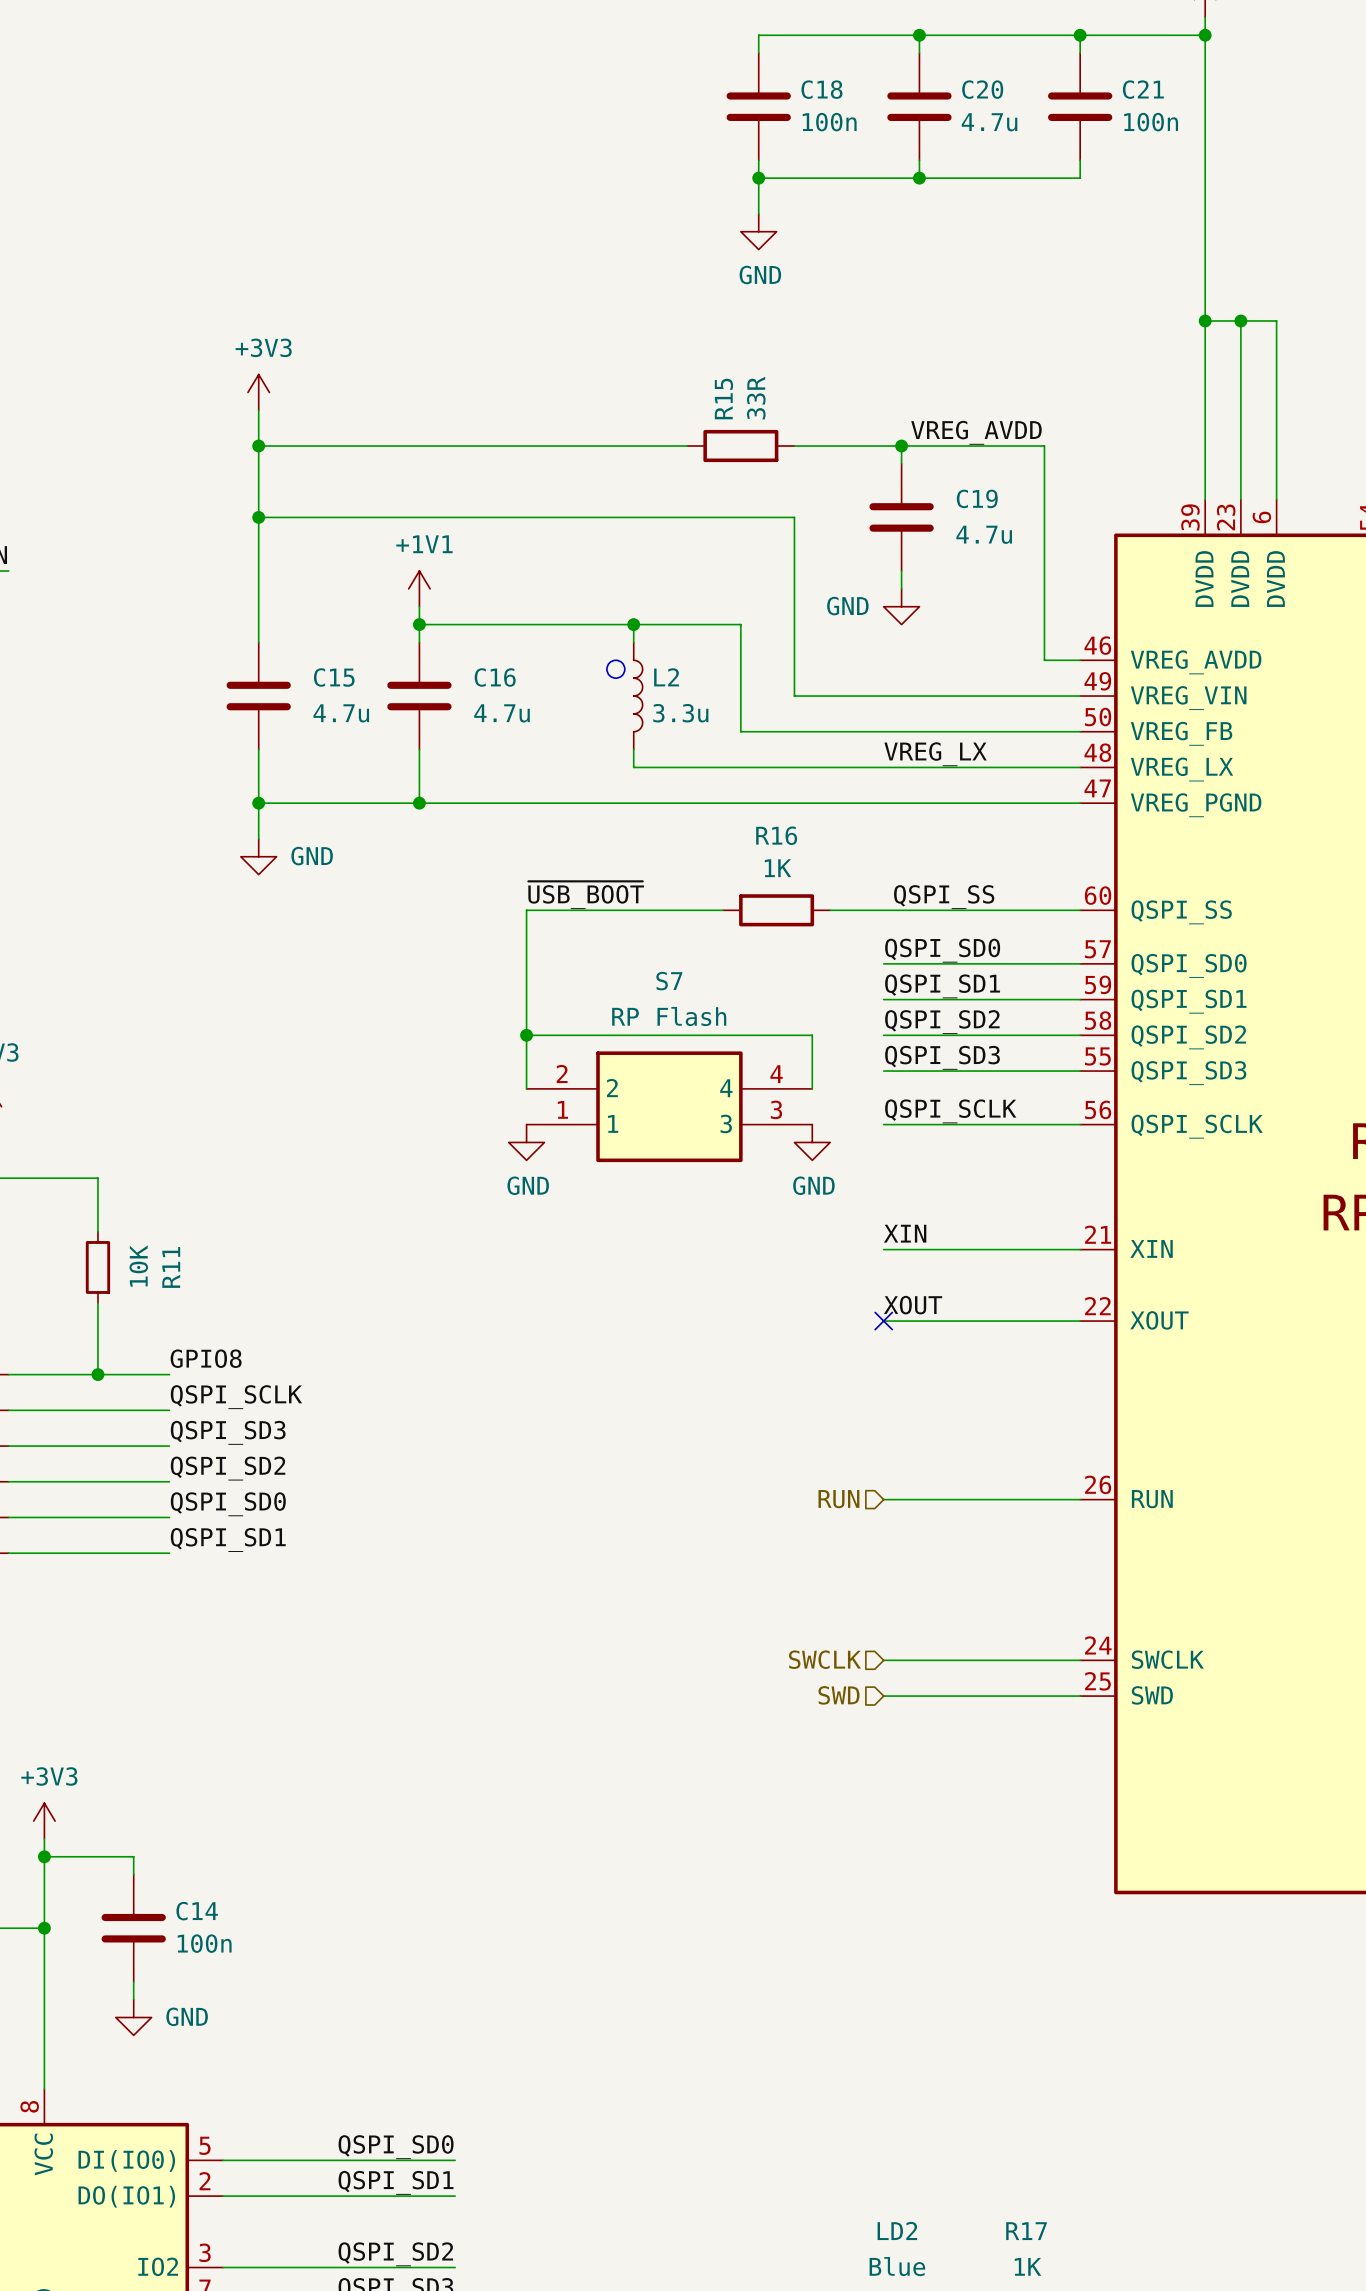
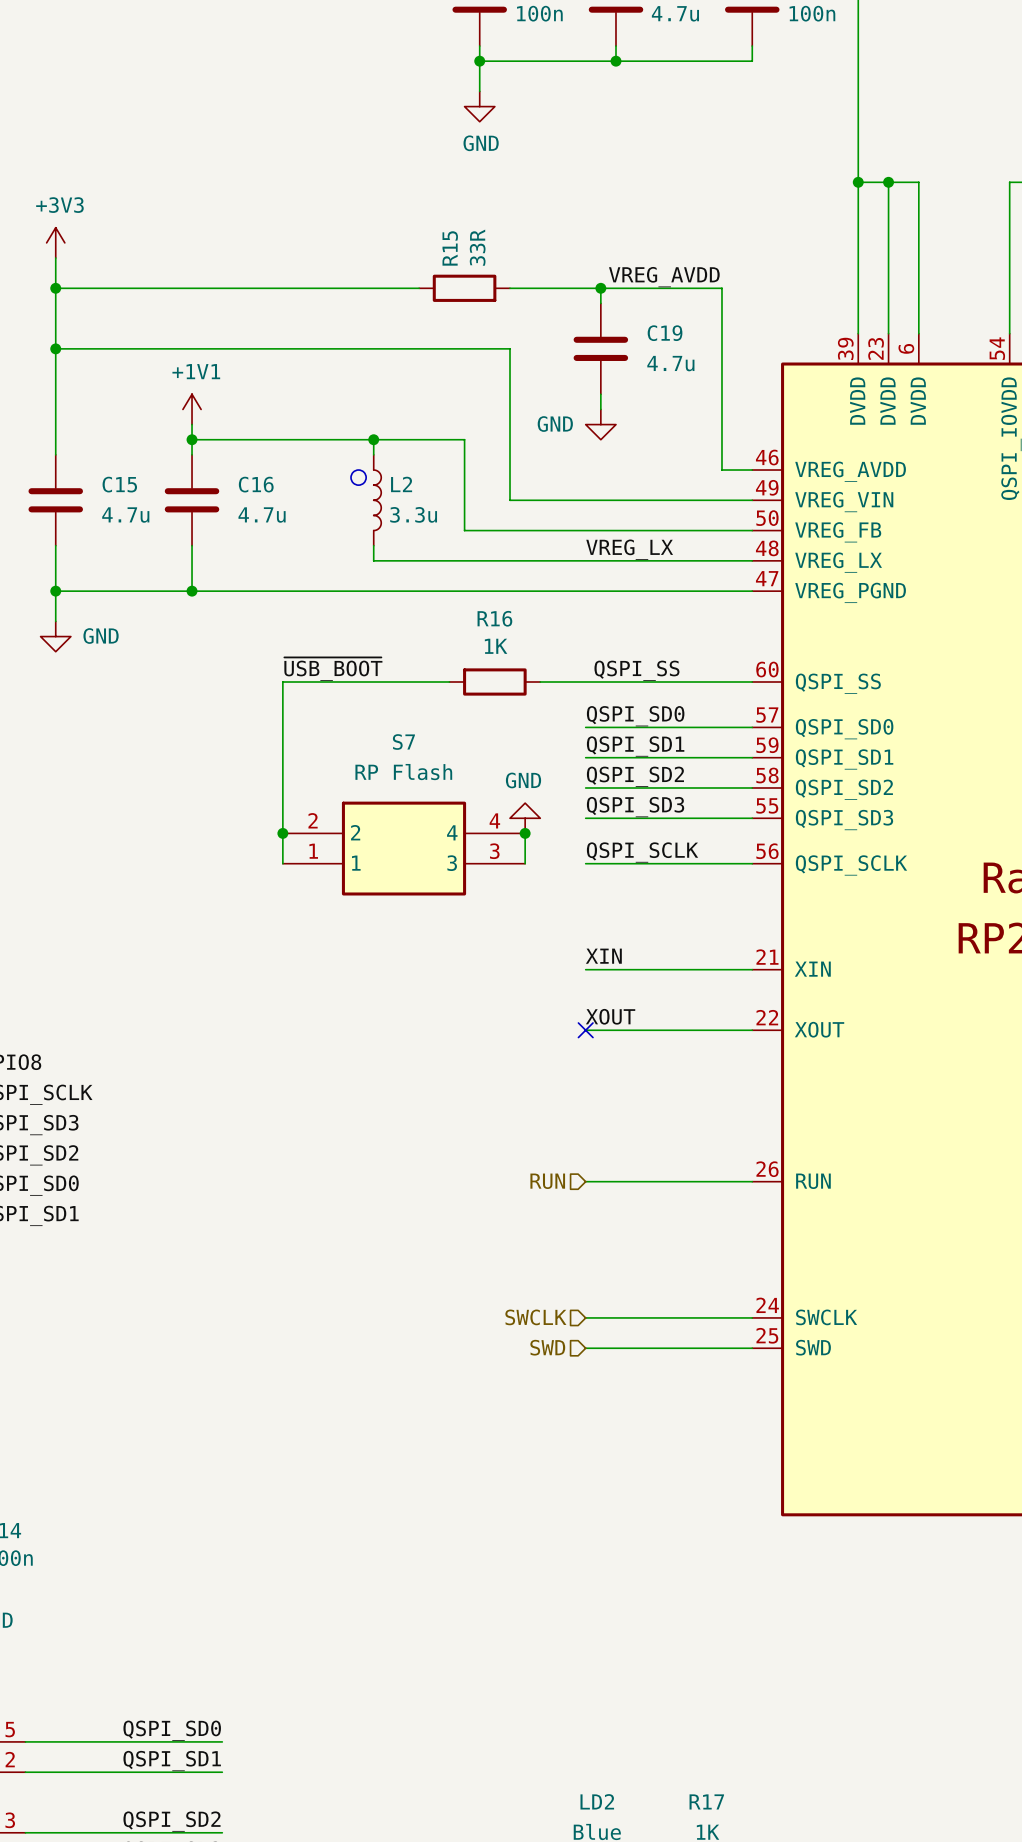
wire: (526, 1035) (812, 1035) (812, 1088) -> (525, 863) (525, 833)
junction position: (526, 1035) -> (282, 833)
wire: none -> (282, 833) (282, 863)
junction: none -> (525, 833)
power symbol: GND (526, 1142) -> none
power symbol rotation: 0° (812, 1142) -> 180° (525, 818)
power symbol position: GND (812, 1142) -> GND (525, 818)

